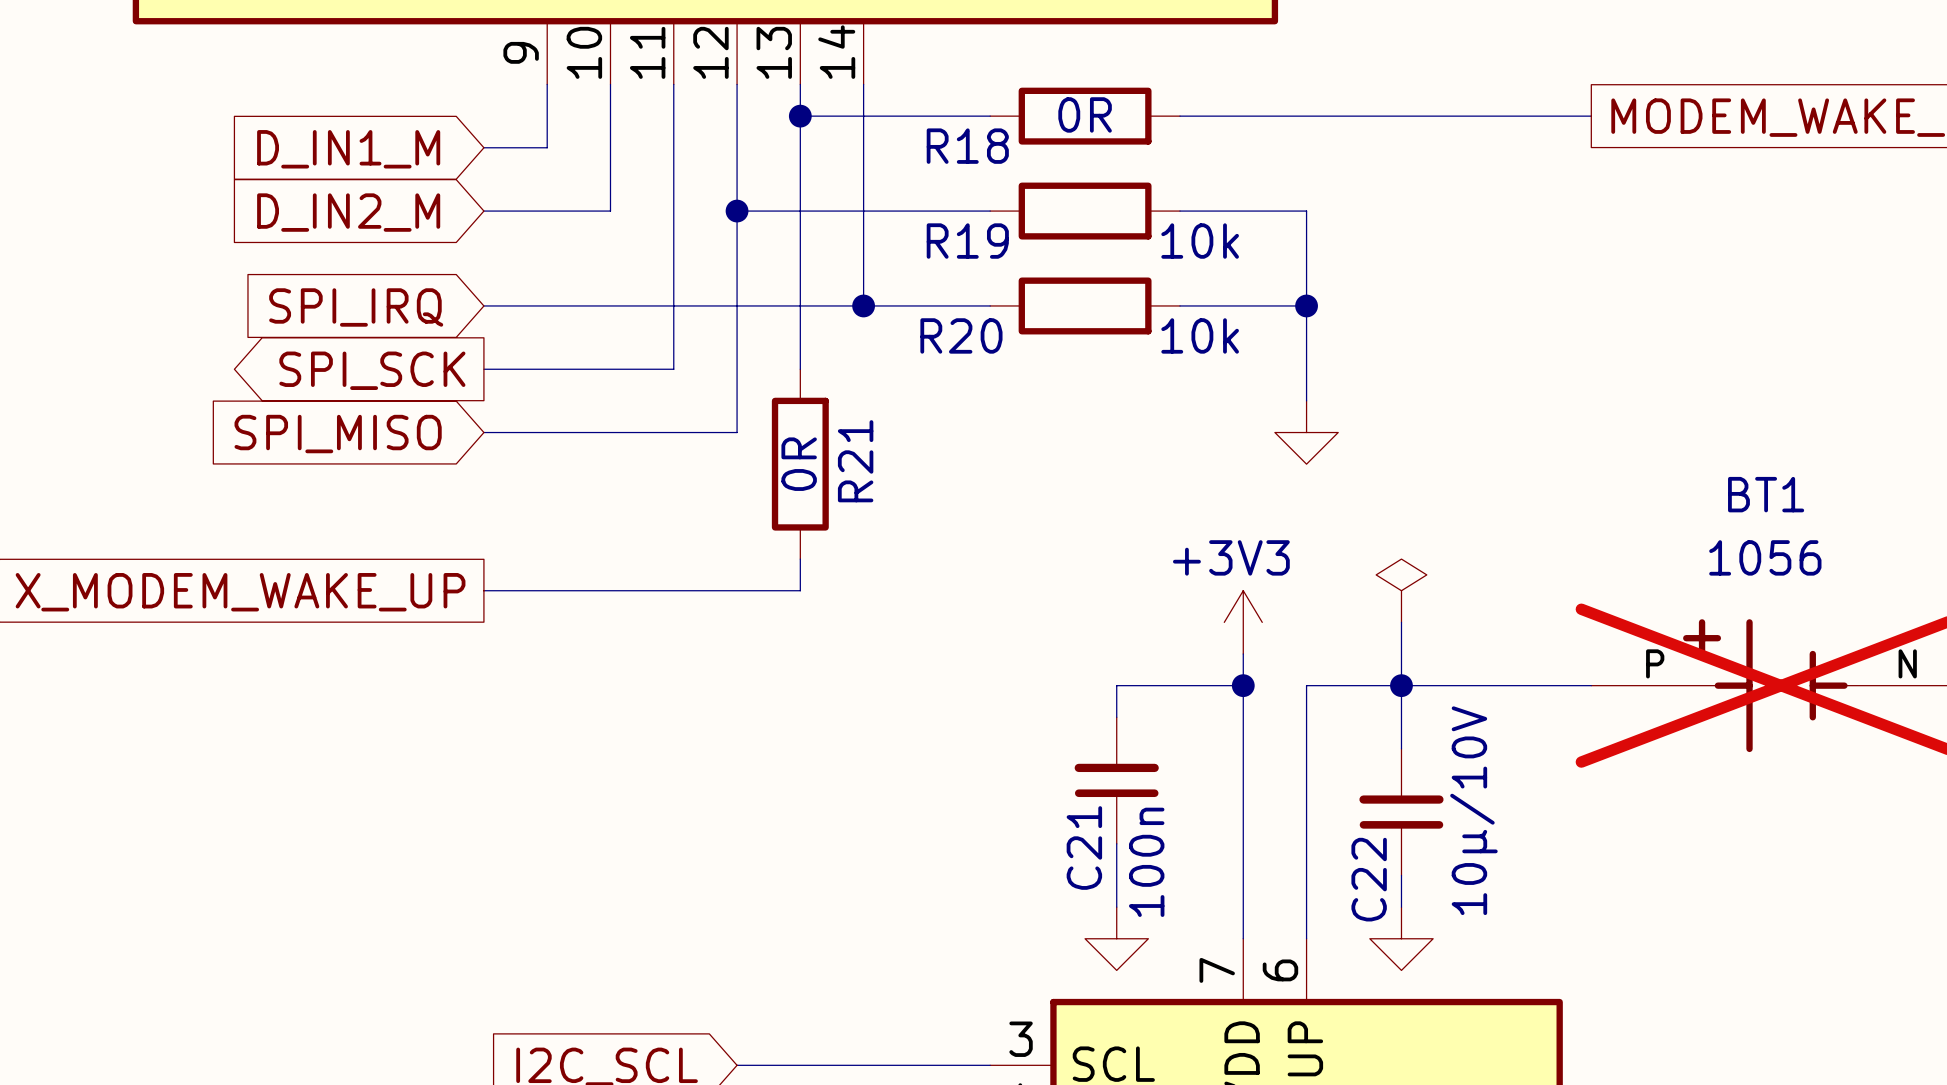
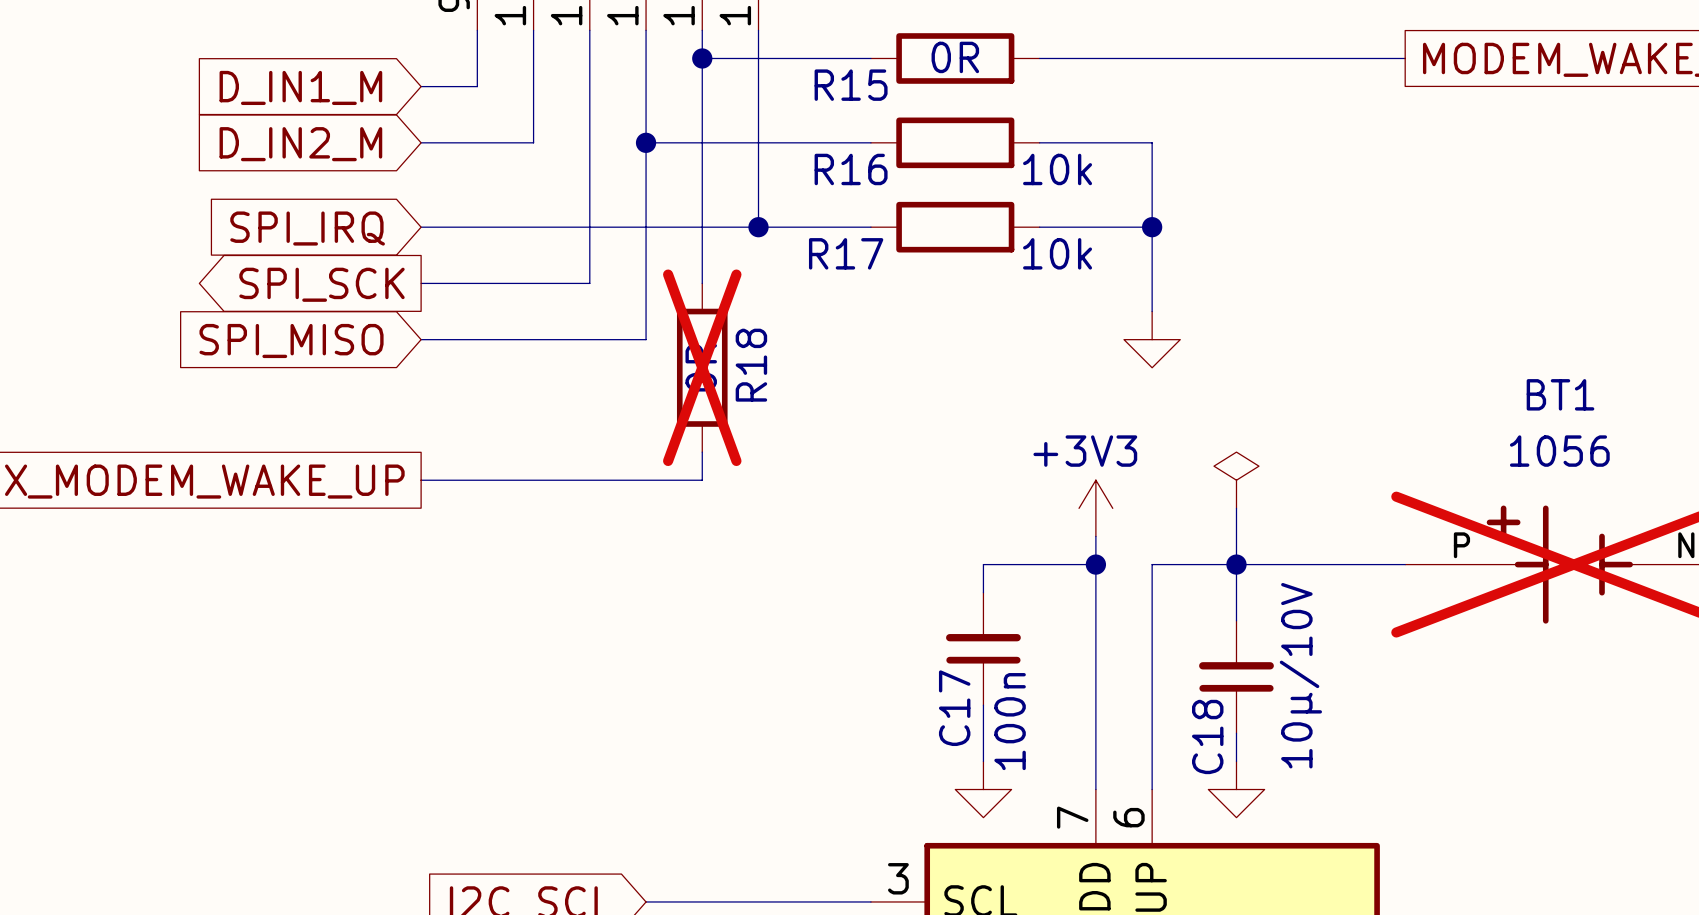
R18 name: R18 (967, 146) -> R15 (851, 85)
R19 name: R19 (967, 241) -> R16 (851, 169)
R20 name: R20 (961, 335) -> R17 (846, 253)
R21 name: R21 (855, 461) -> R18 (751, 365)
R21 do-not-place cross: none -> (702, 367)
C21 name: C21 (1084, 848) -> C17 (954, 708)
C22 name: C22 (1369, 879) -> C18 (1207, 736)

